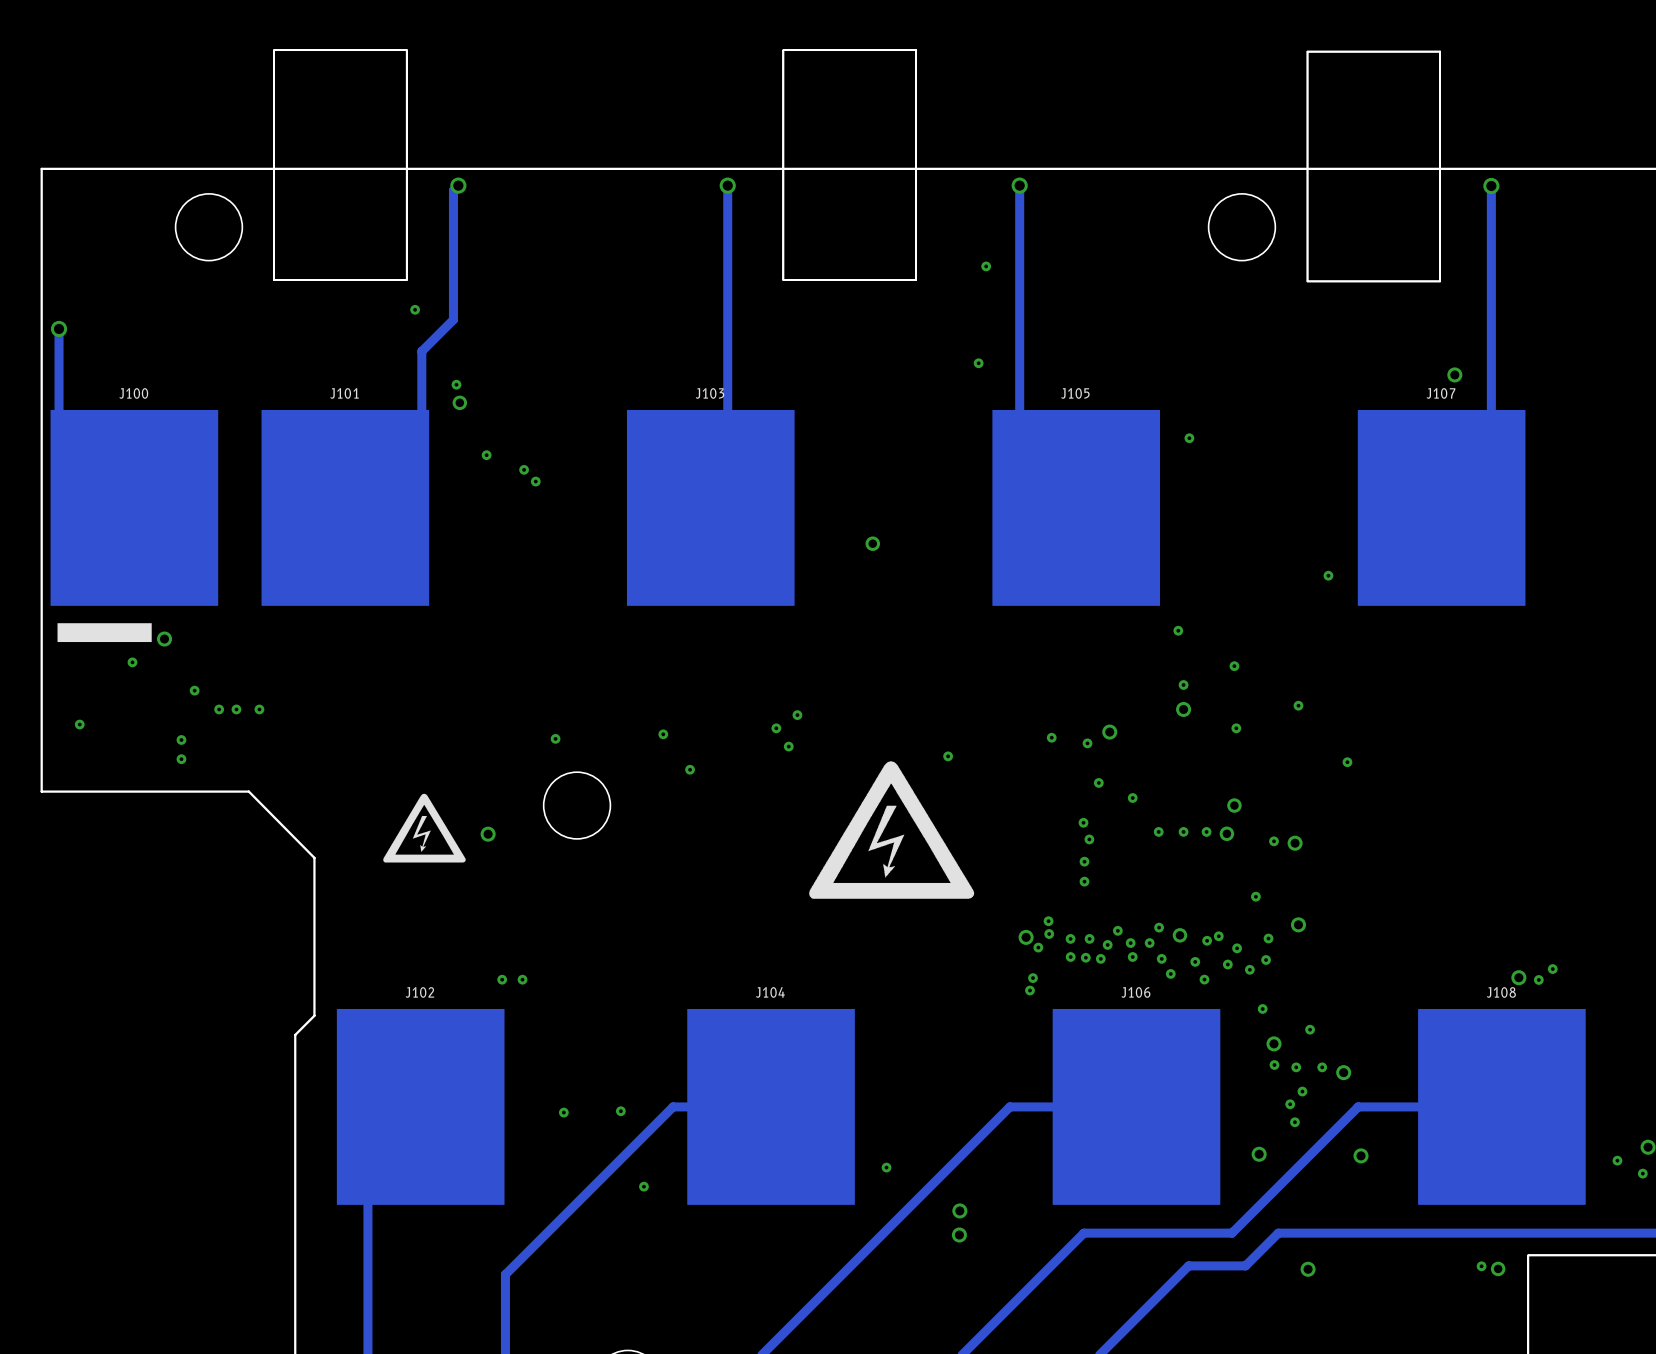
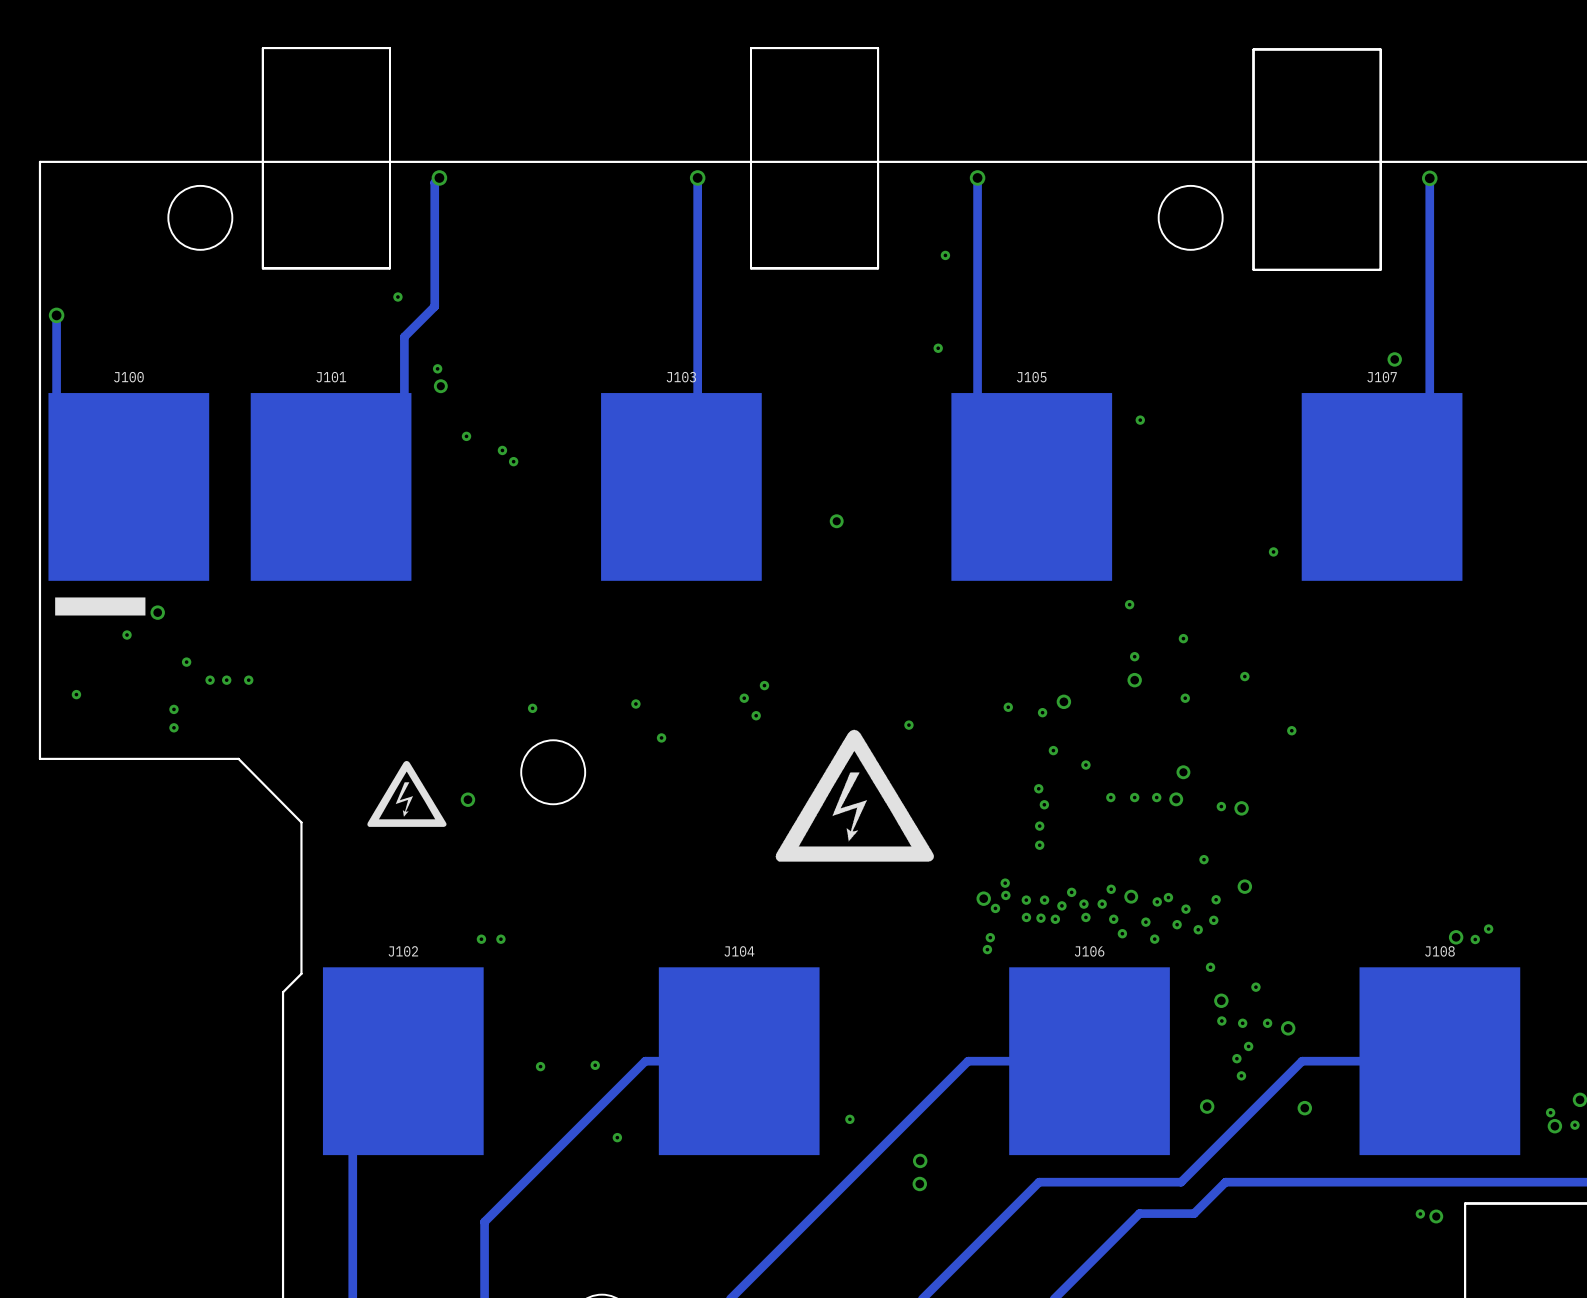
via: none -> (1554, 1126)
via: (1308, 1269) -> none

